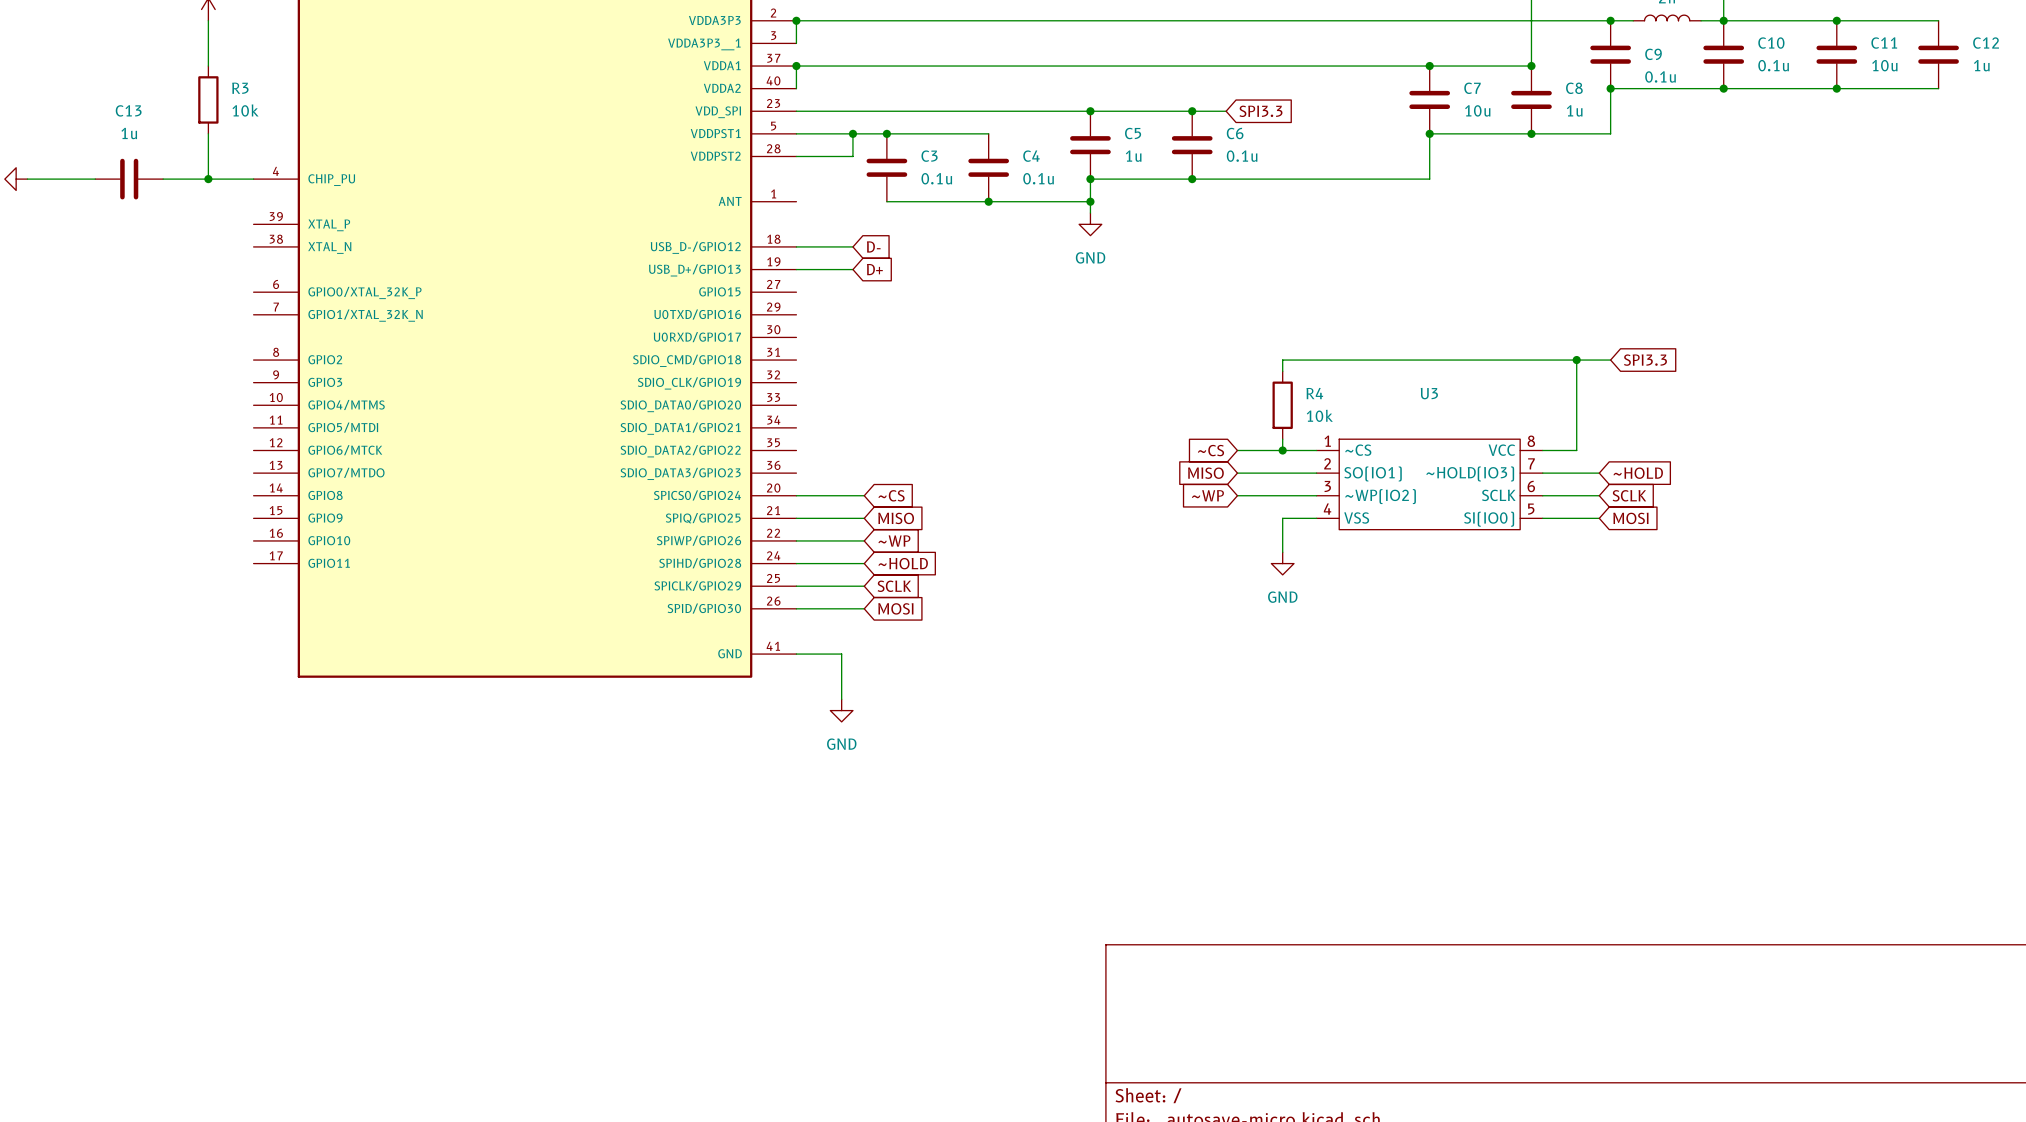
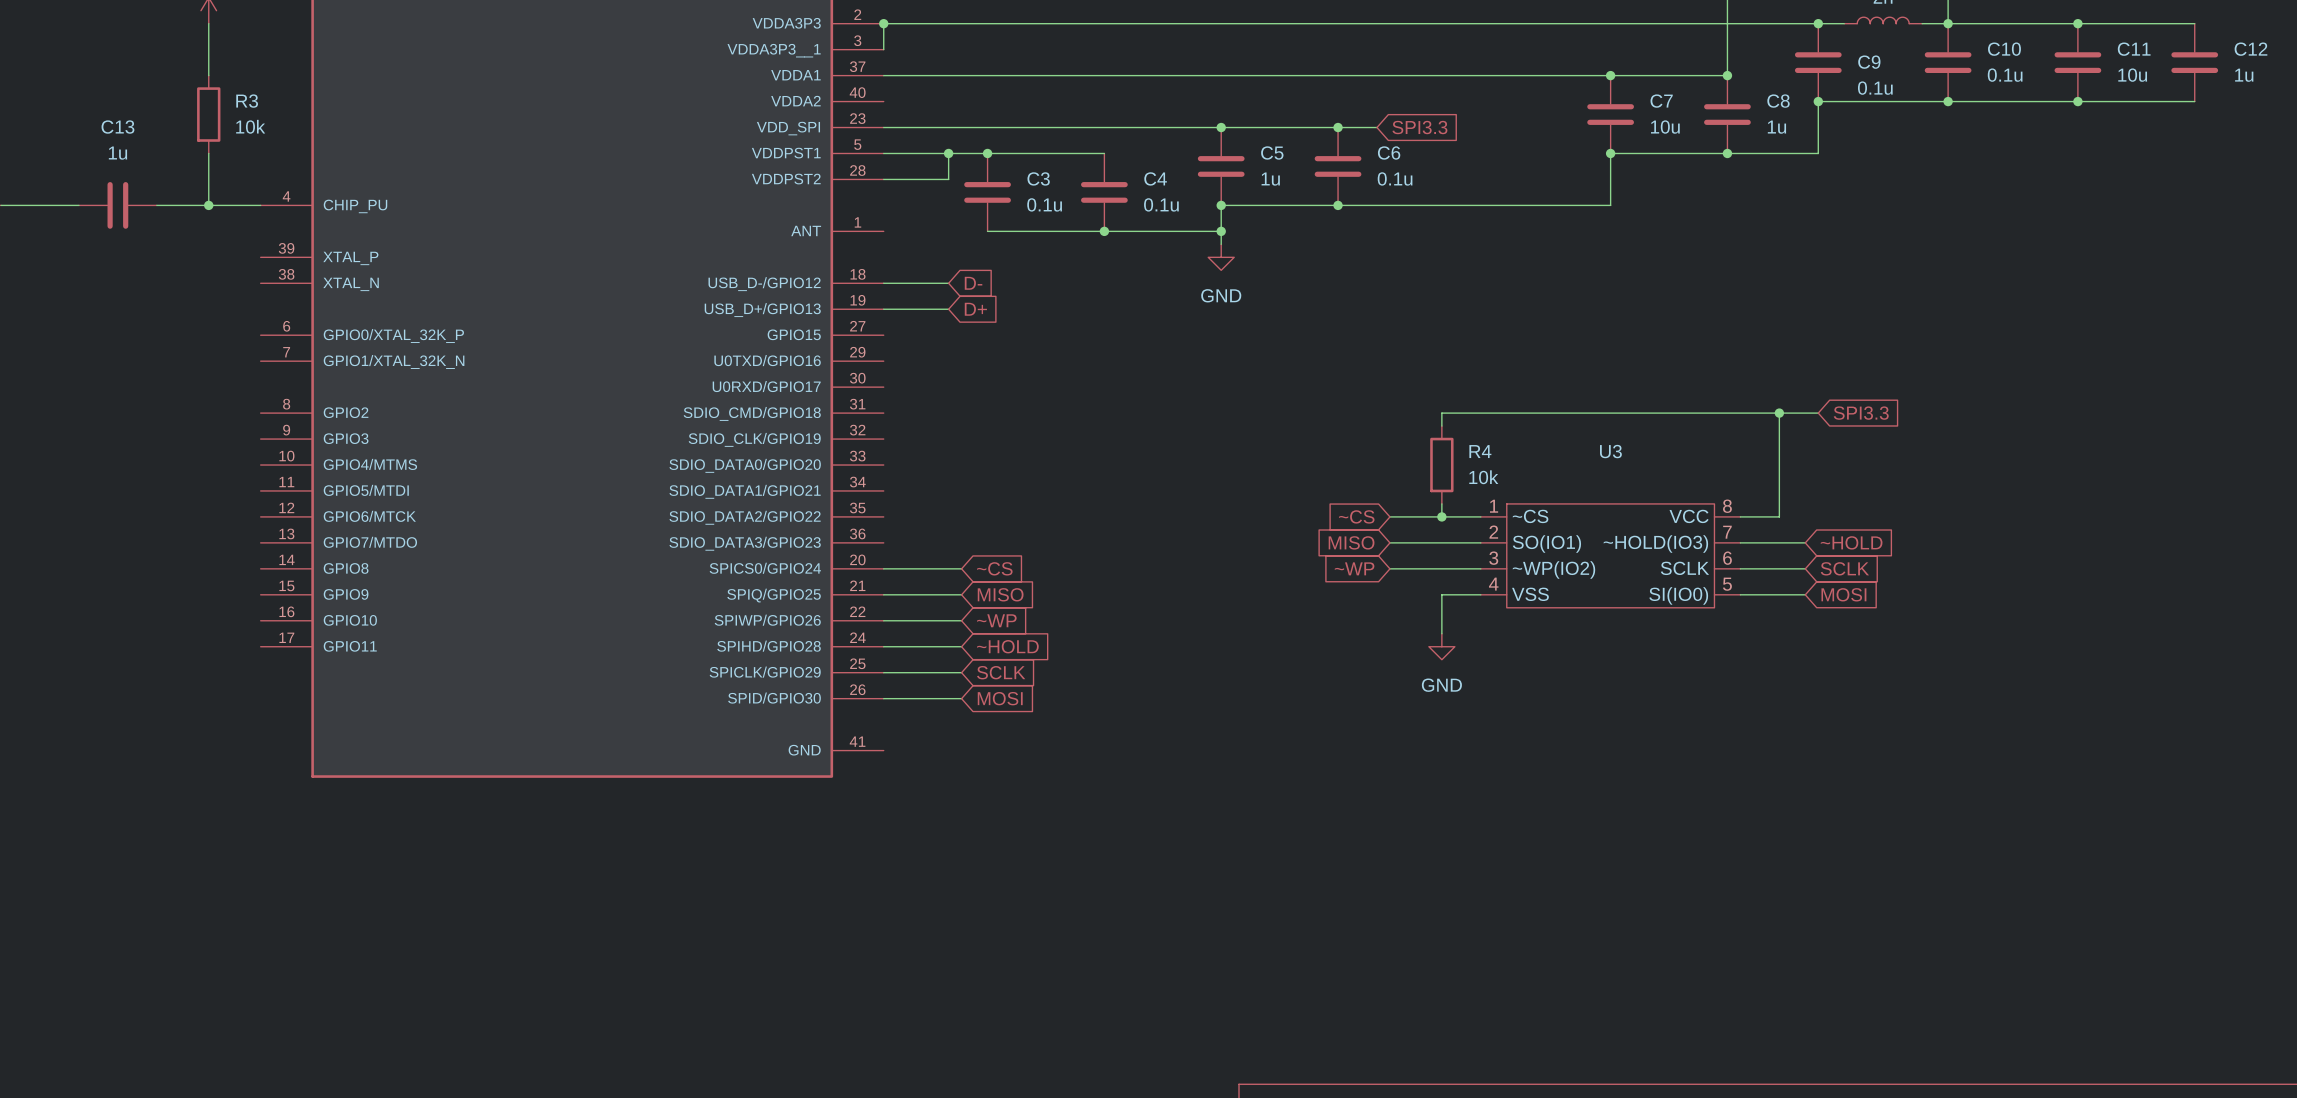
wire: (796, 66) (796, 88) -> none
junction: (796, 66) -> none
wire: (796, 654) (841, 654) (841, 699) -> none
power symbol: GND (841, 710) -> none

